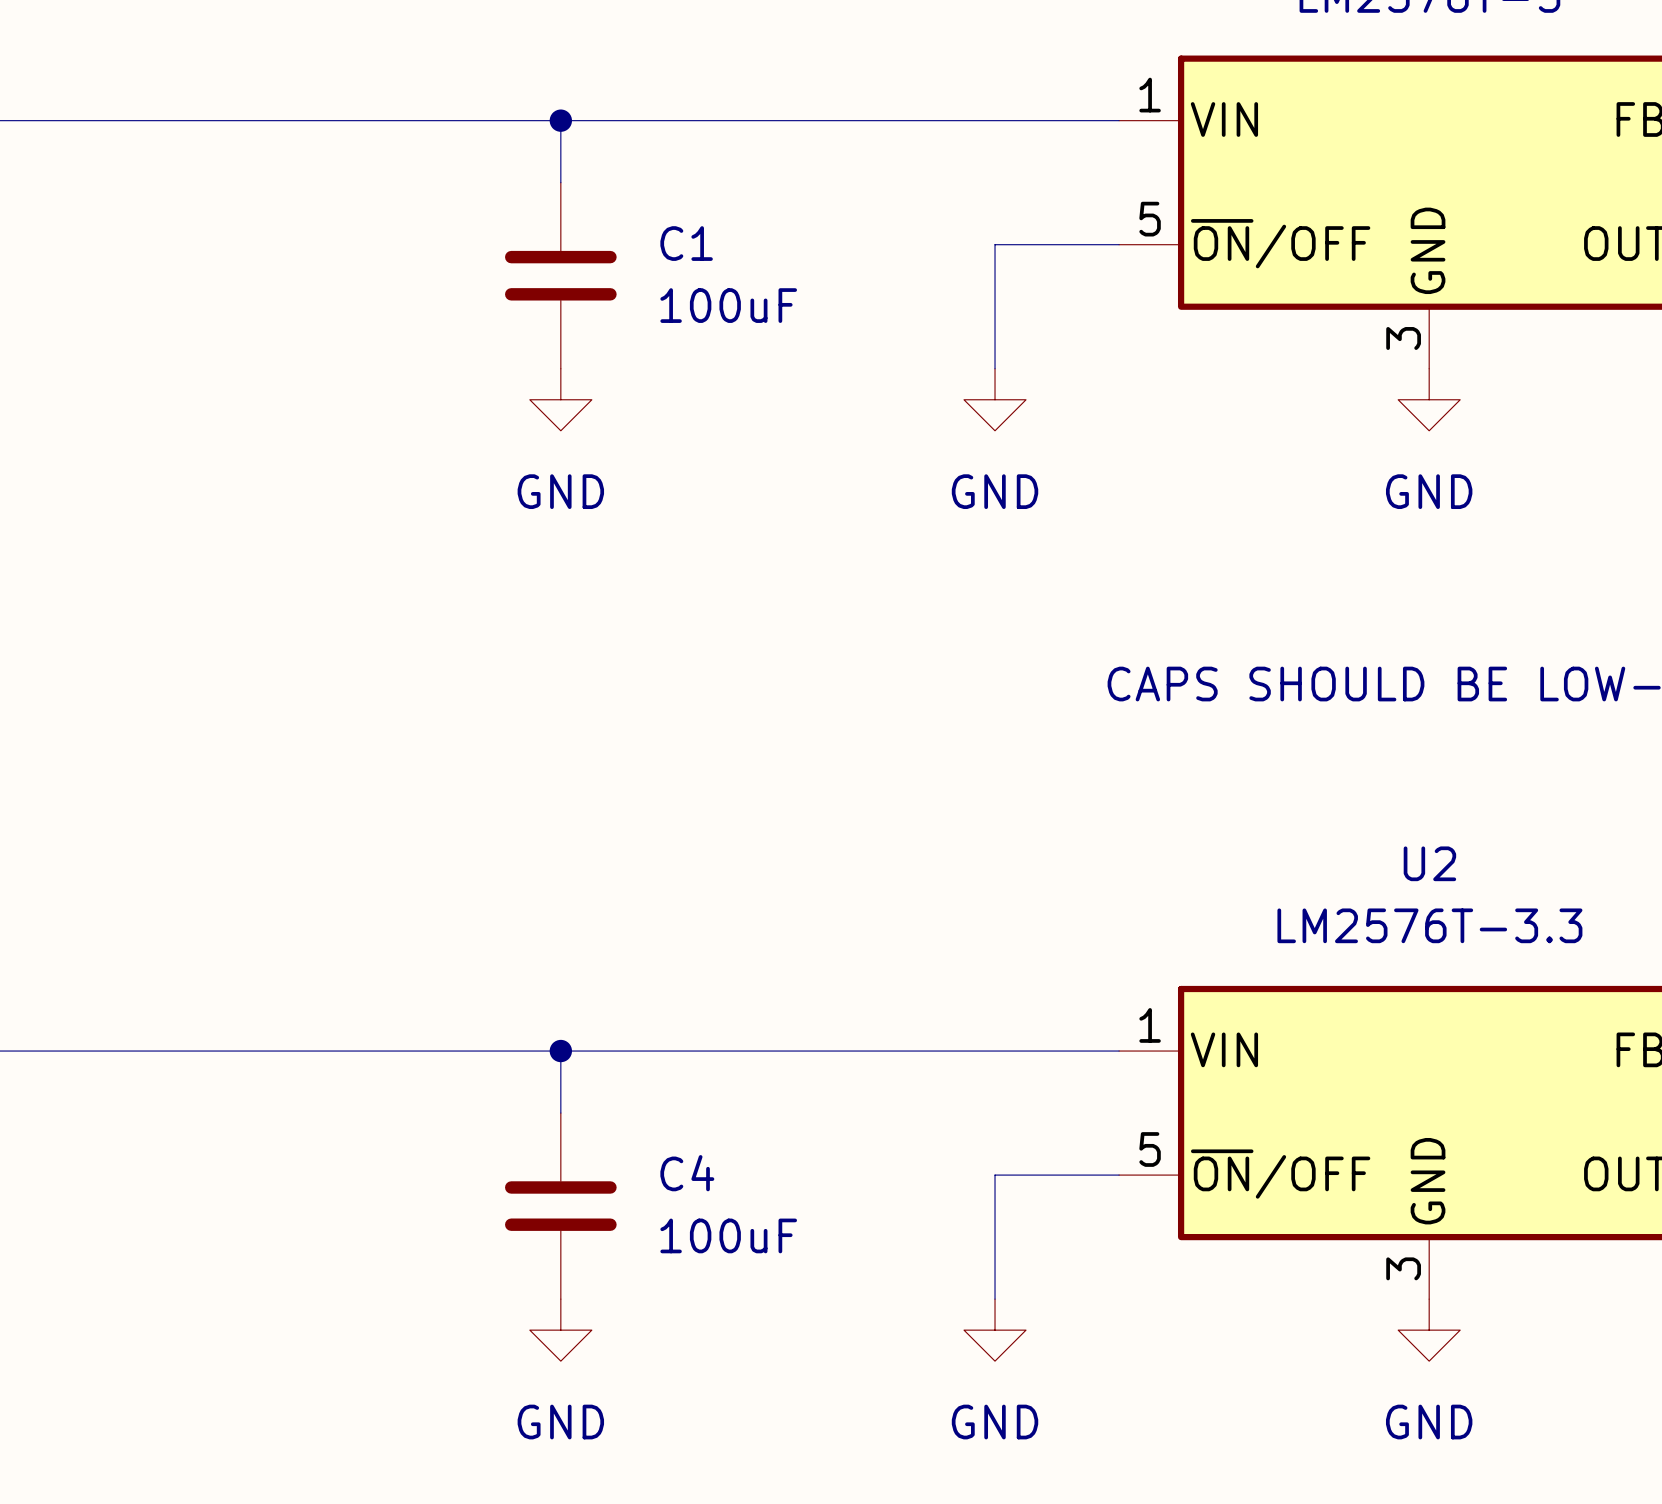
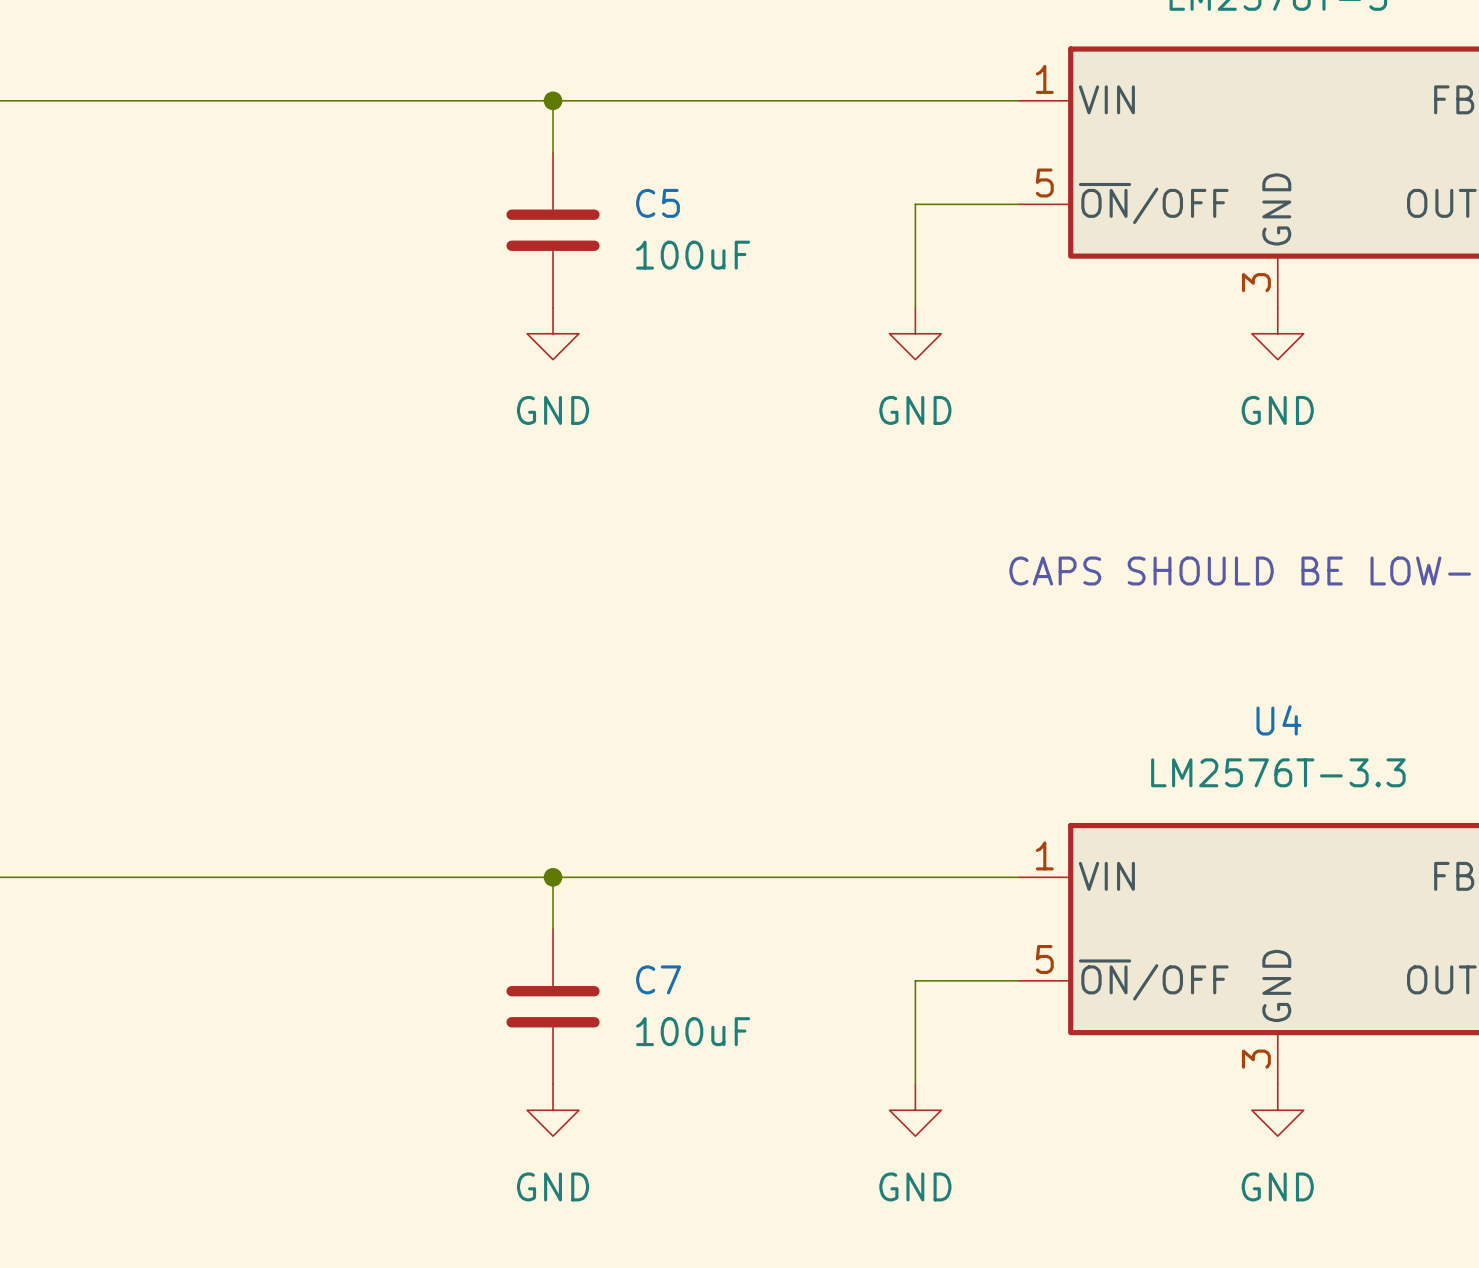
C1 name: C1 (686, 243) -> C5 (657, 203)
U2 name: U2 (1429, 863) -> U4 (1278, 720)
C4 name: C4 (687, 1173) -> C7 (658, 979)

